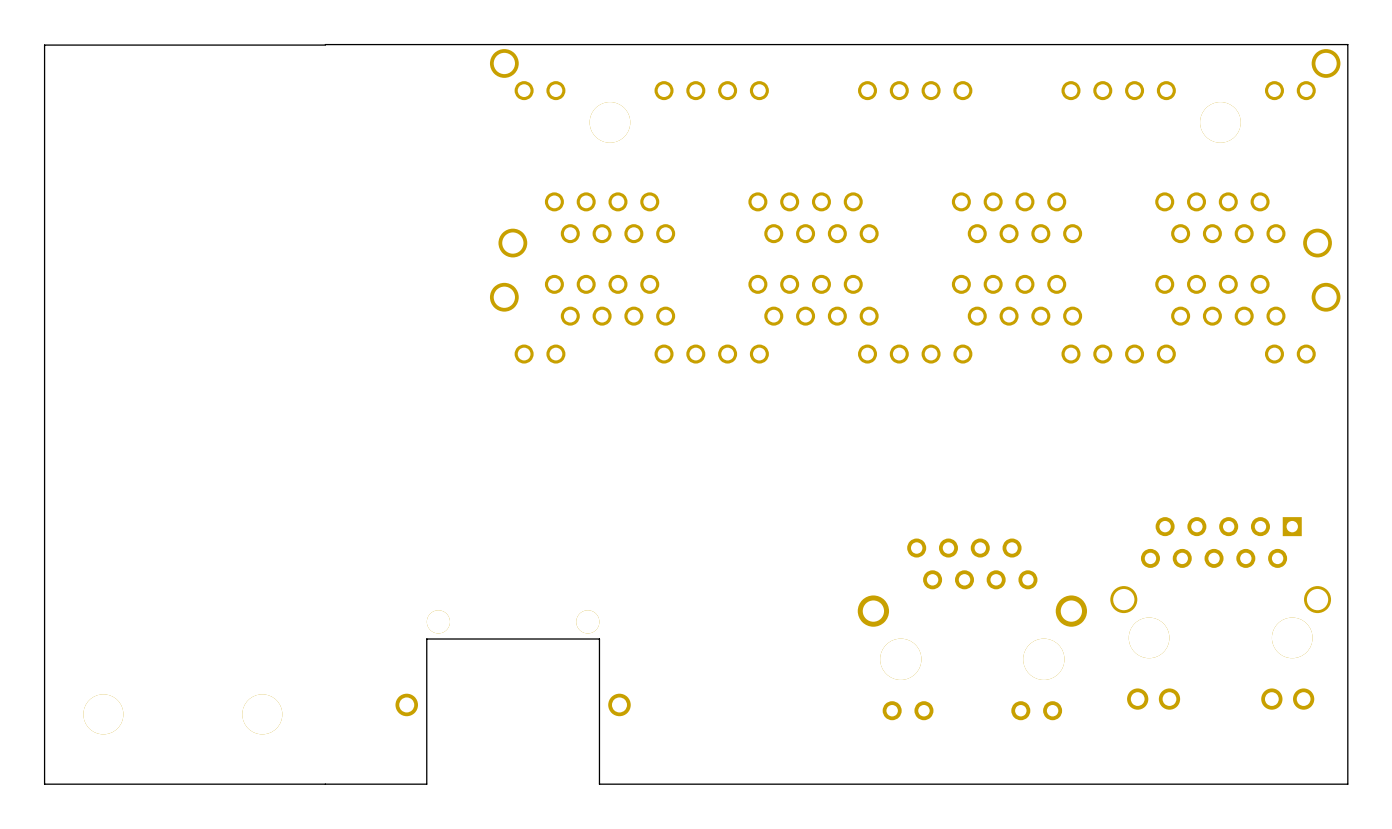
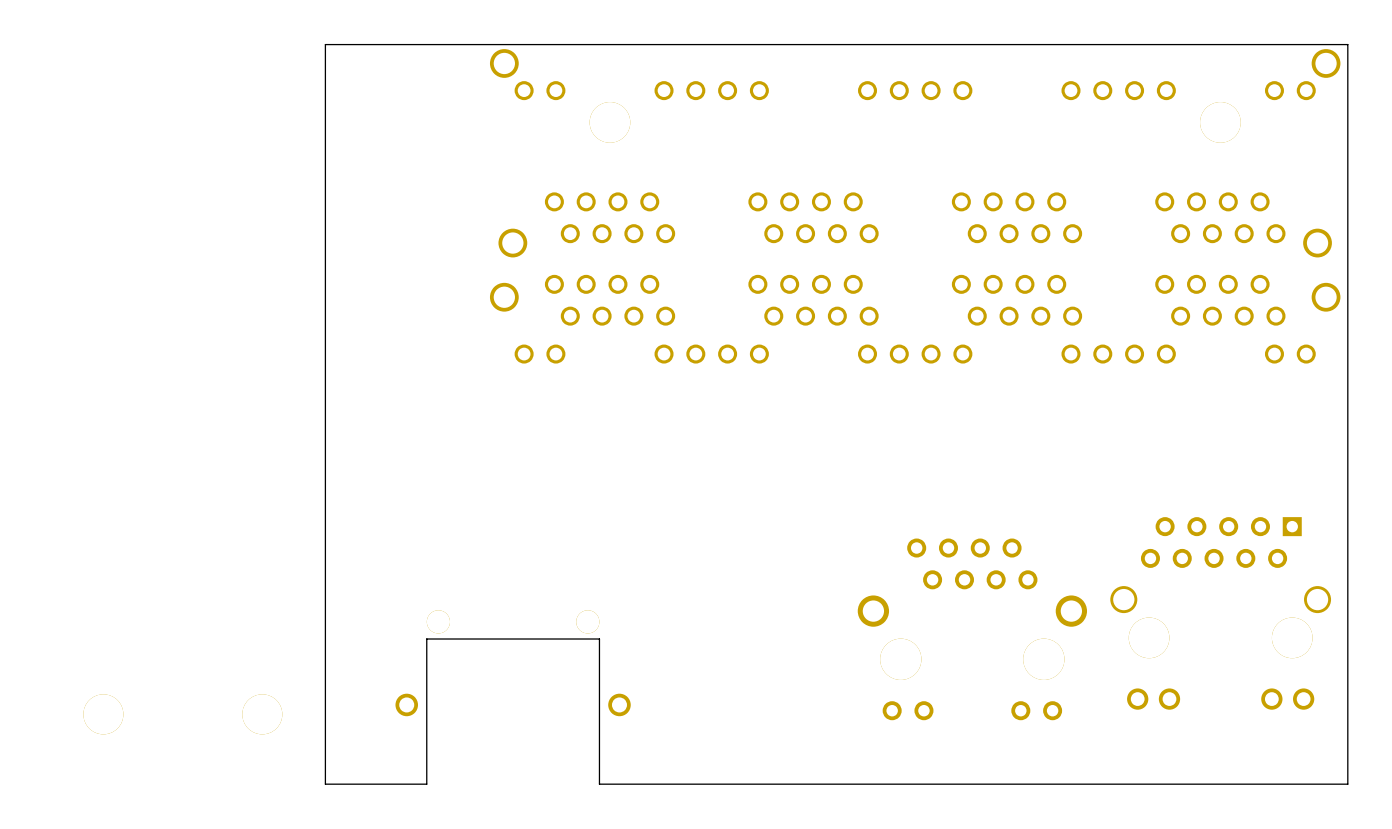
board edge: (325, 45) (44, 45) (44, 784) (325, 784) -> (325, 44) (325, 784)

